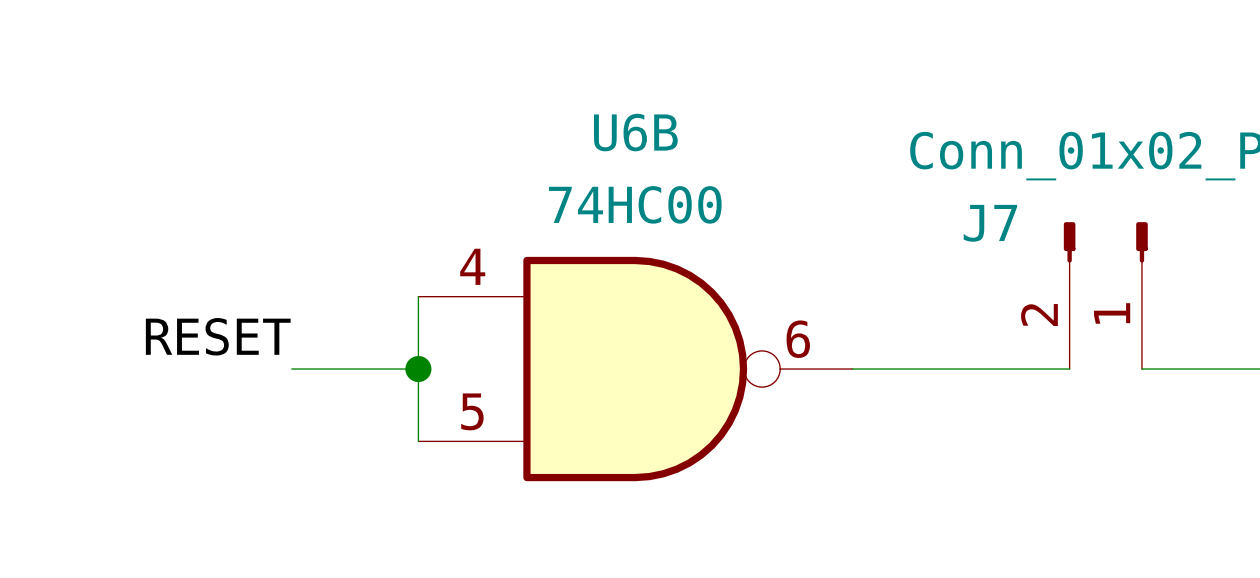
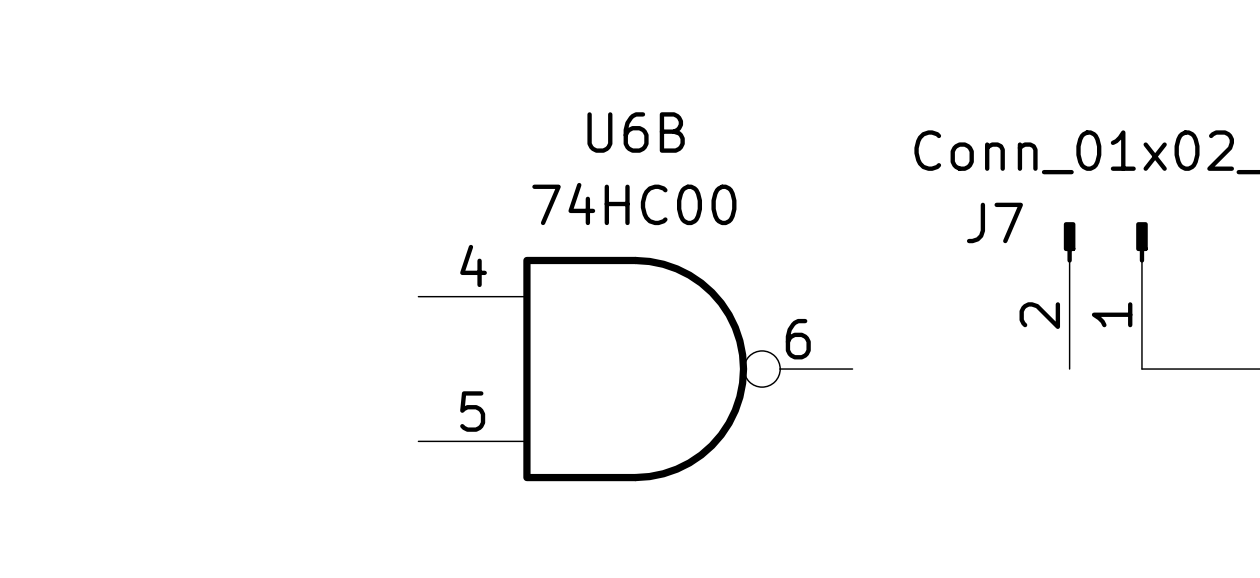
wire: (418, 296) (418, 441) -> none
label: RESET (218, 336) -> none
wire: (291, 369) (418, 369) -> none
junction: (418, 369) -> none
wire: (852, 369) (1069, 369) -> none

